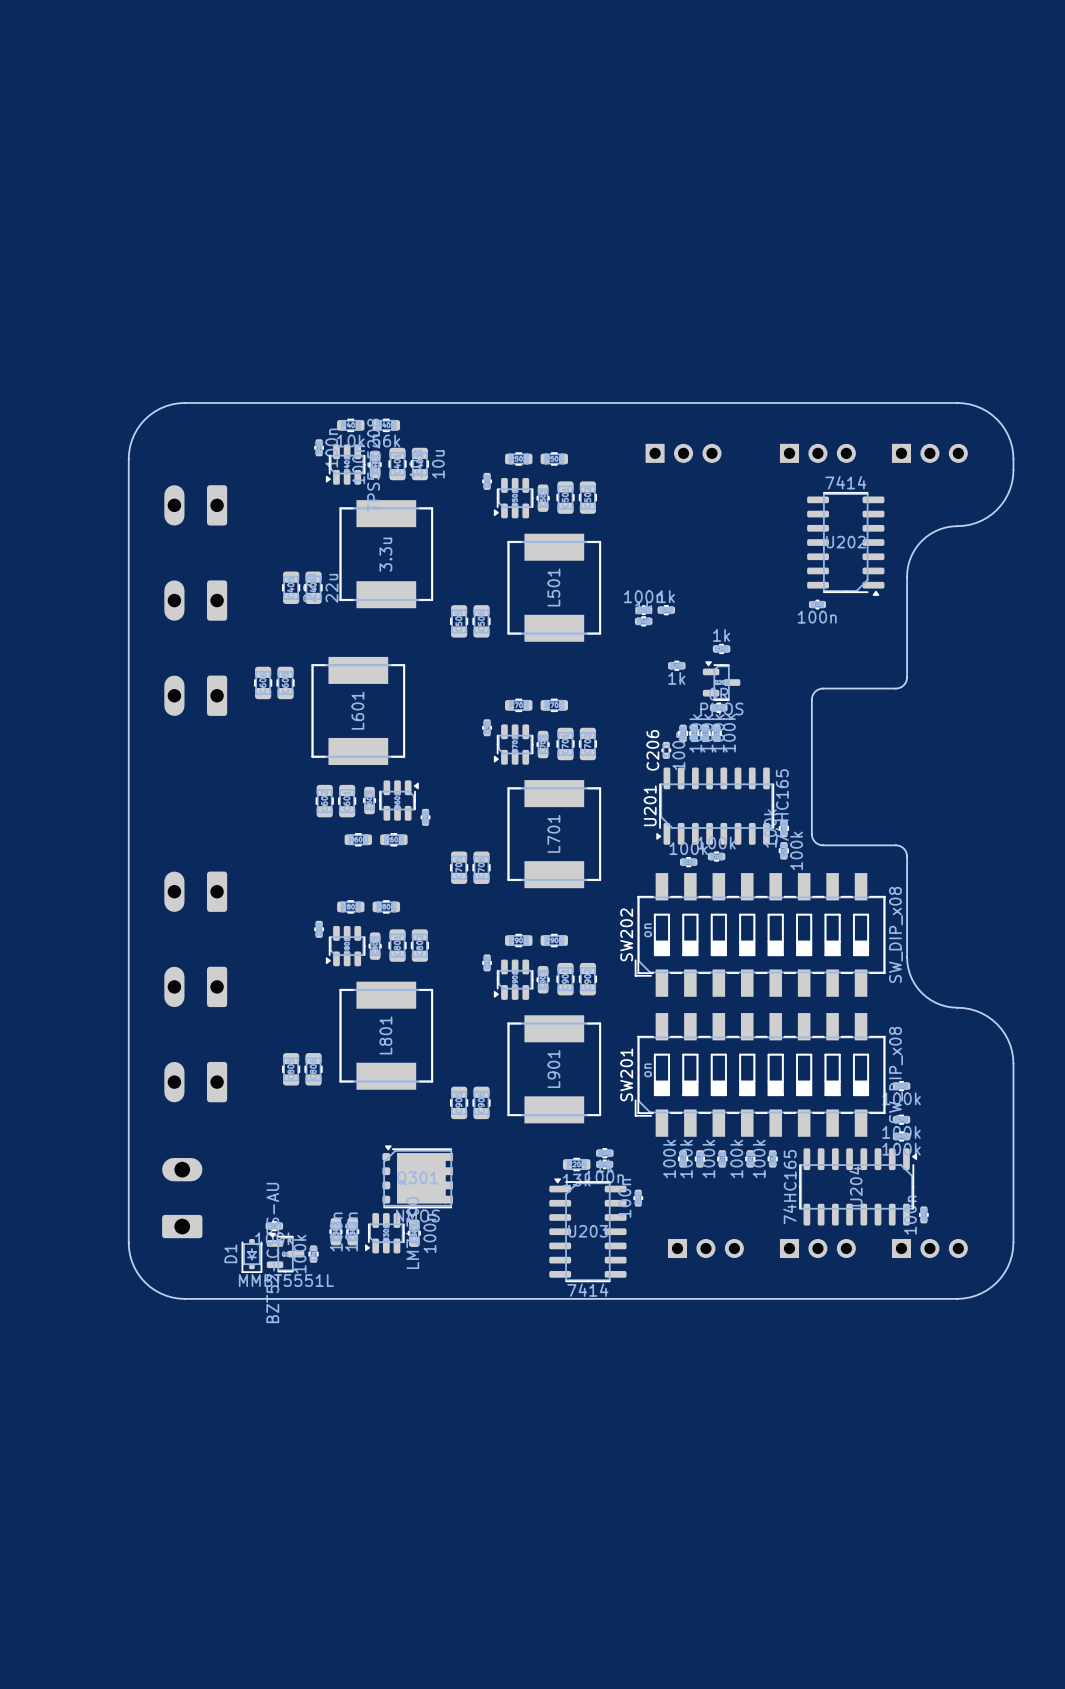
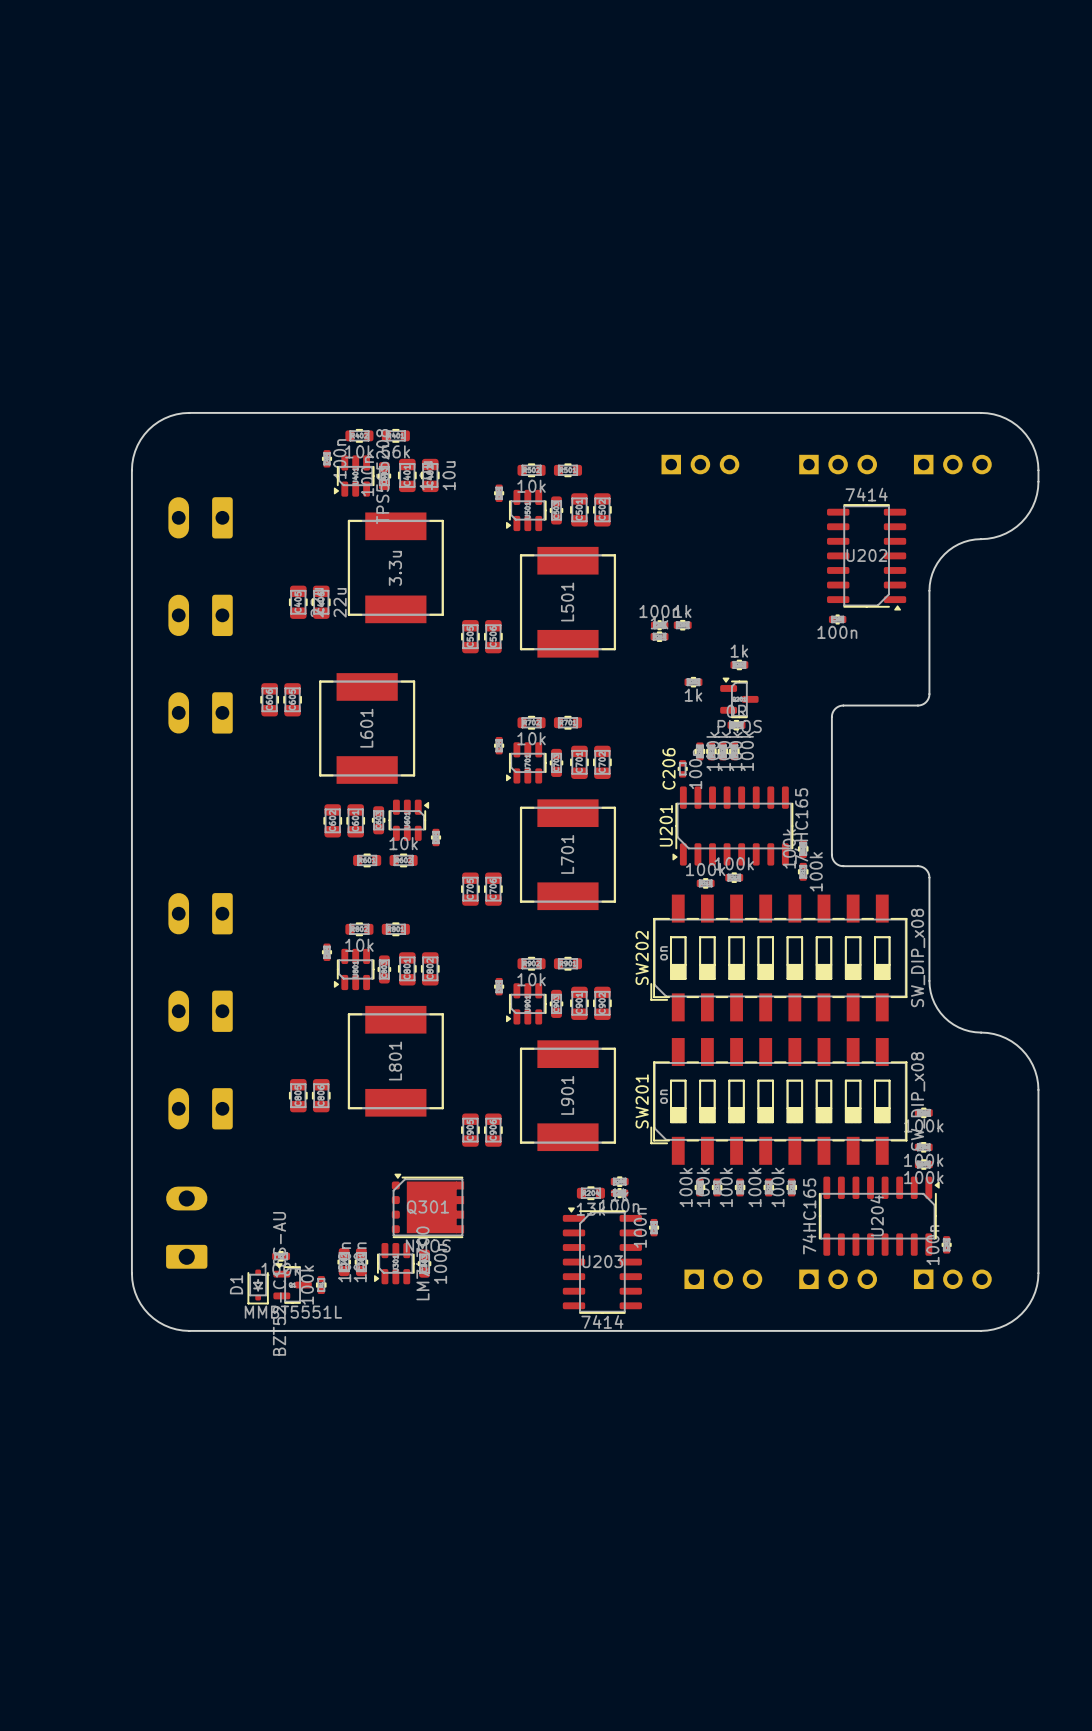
part value: none -> 10k (531, 486)
part value: none -> 10k (531, 738)
part value: none -> 10k (403, 843)
part value: none -> 10k (359, 945)
part value: none -> 10k (531, 979)

